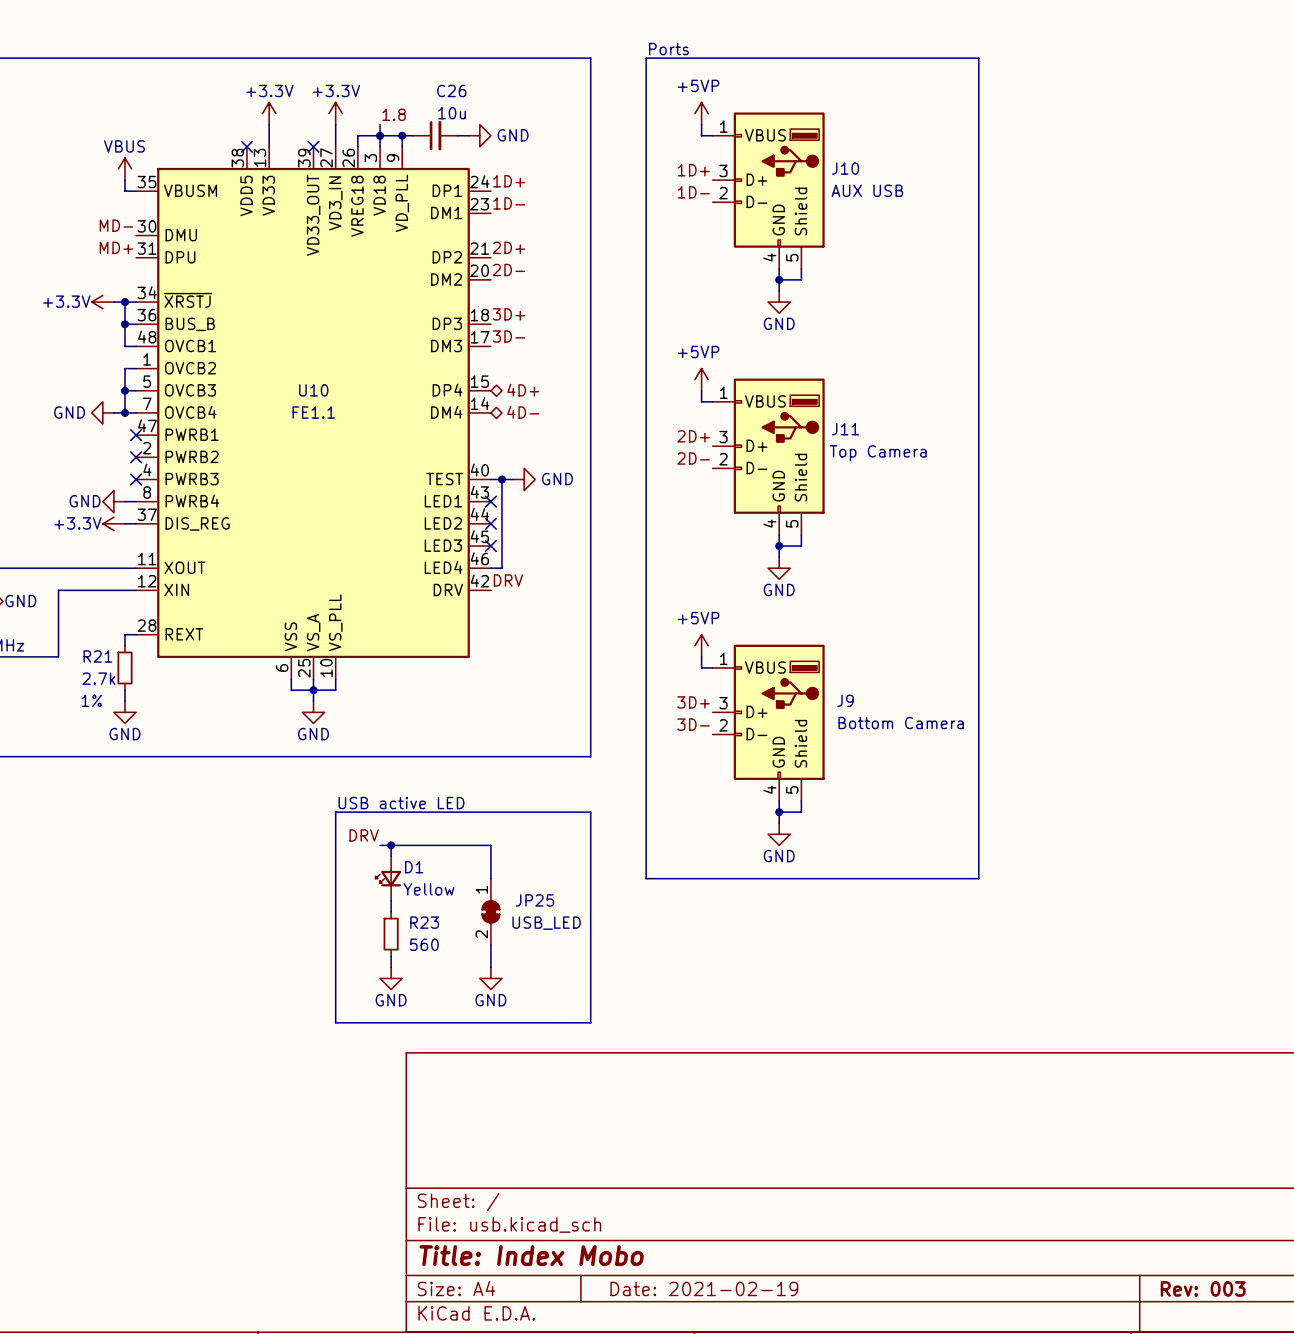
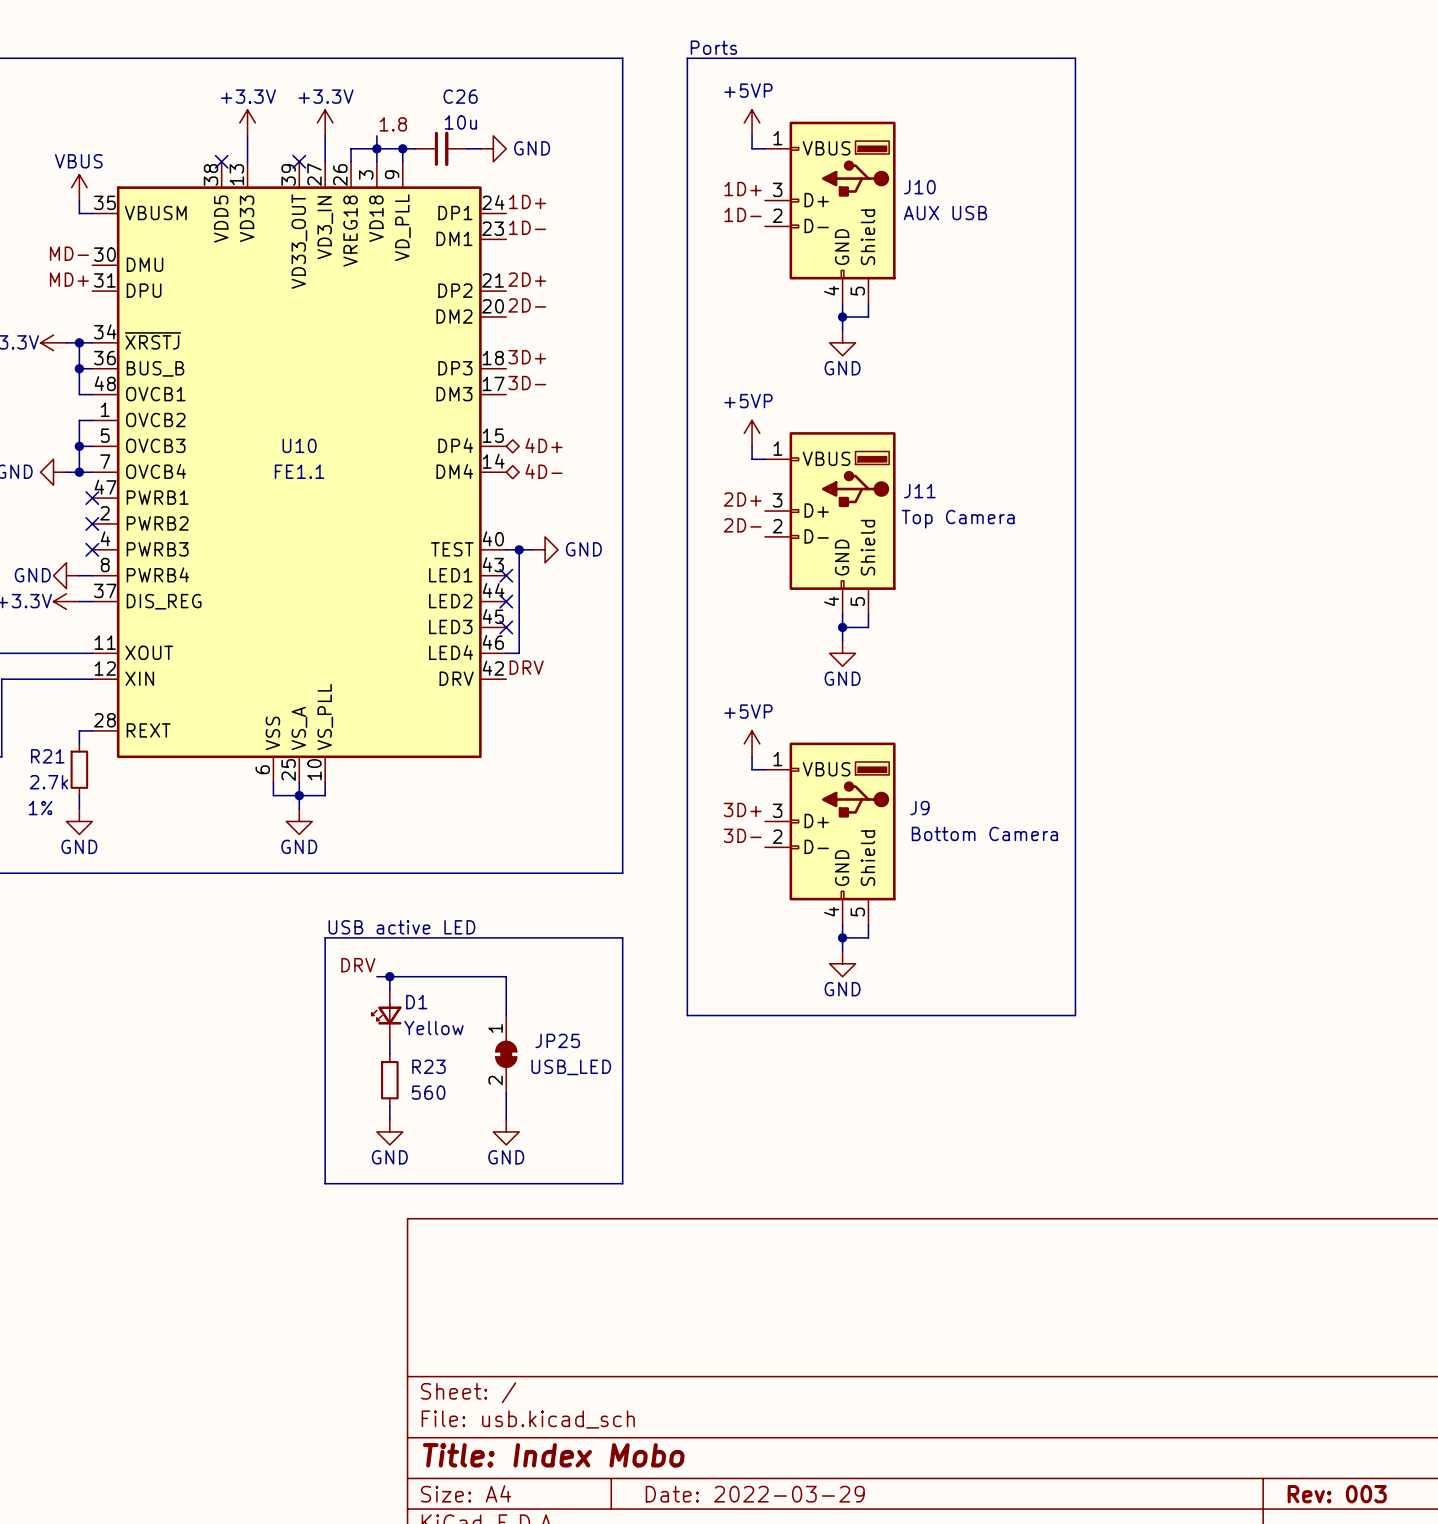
title block: Date: 2021-02-19 (704, 1288) -> Date: 2022-03-29 (755, 1494)

